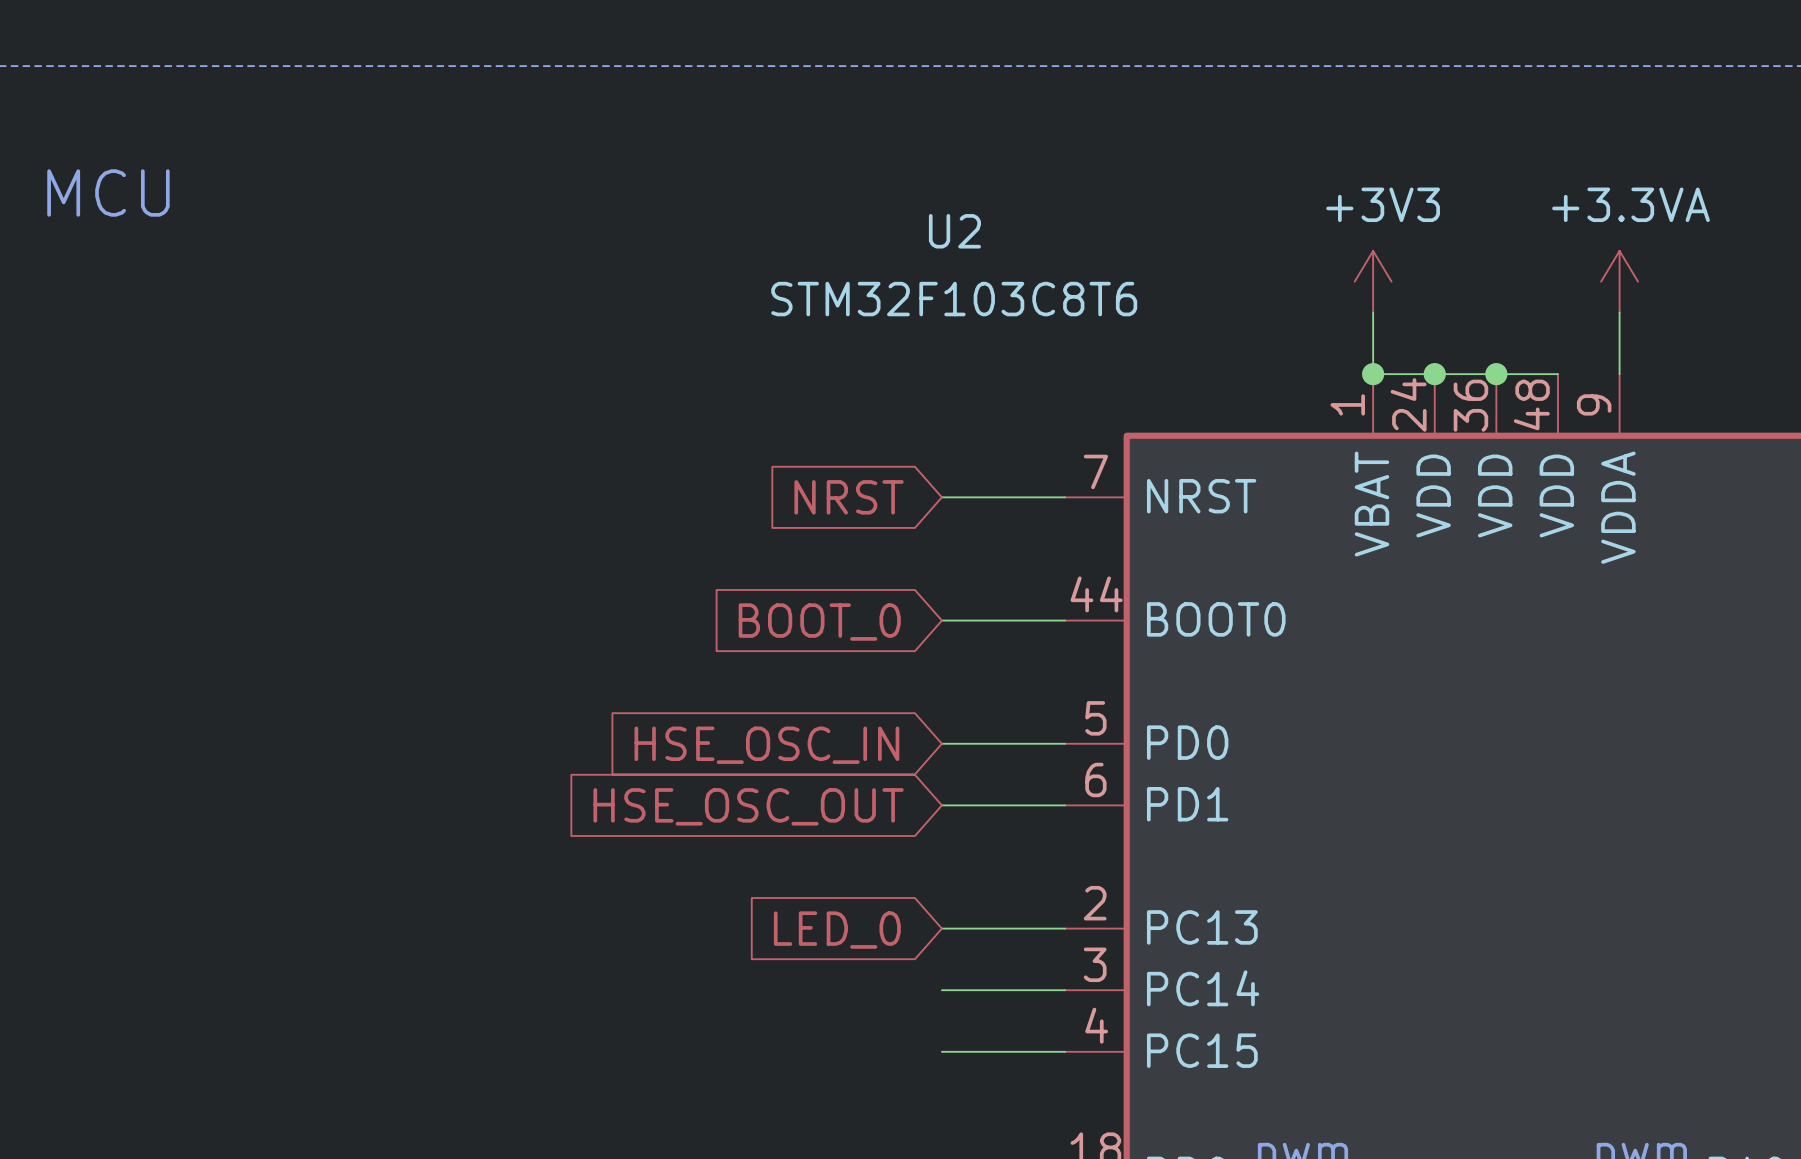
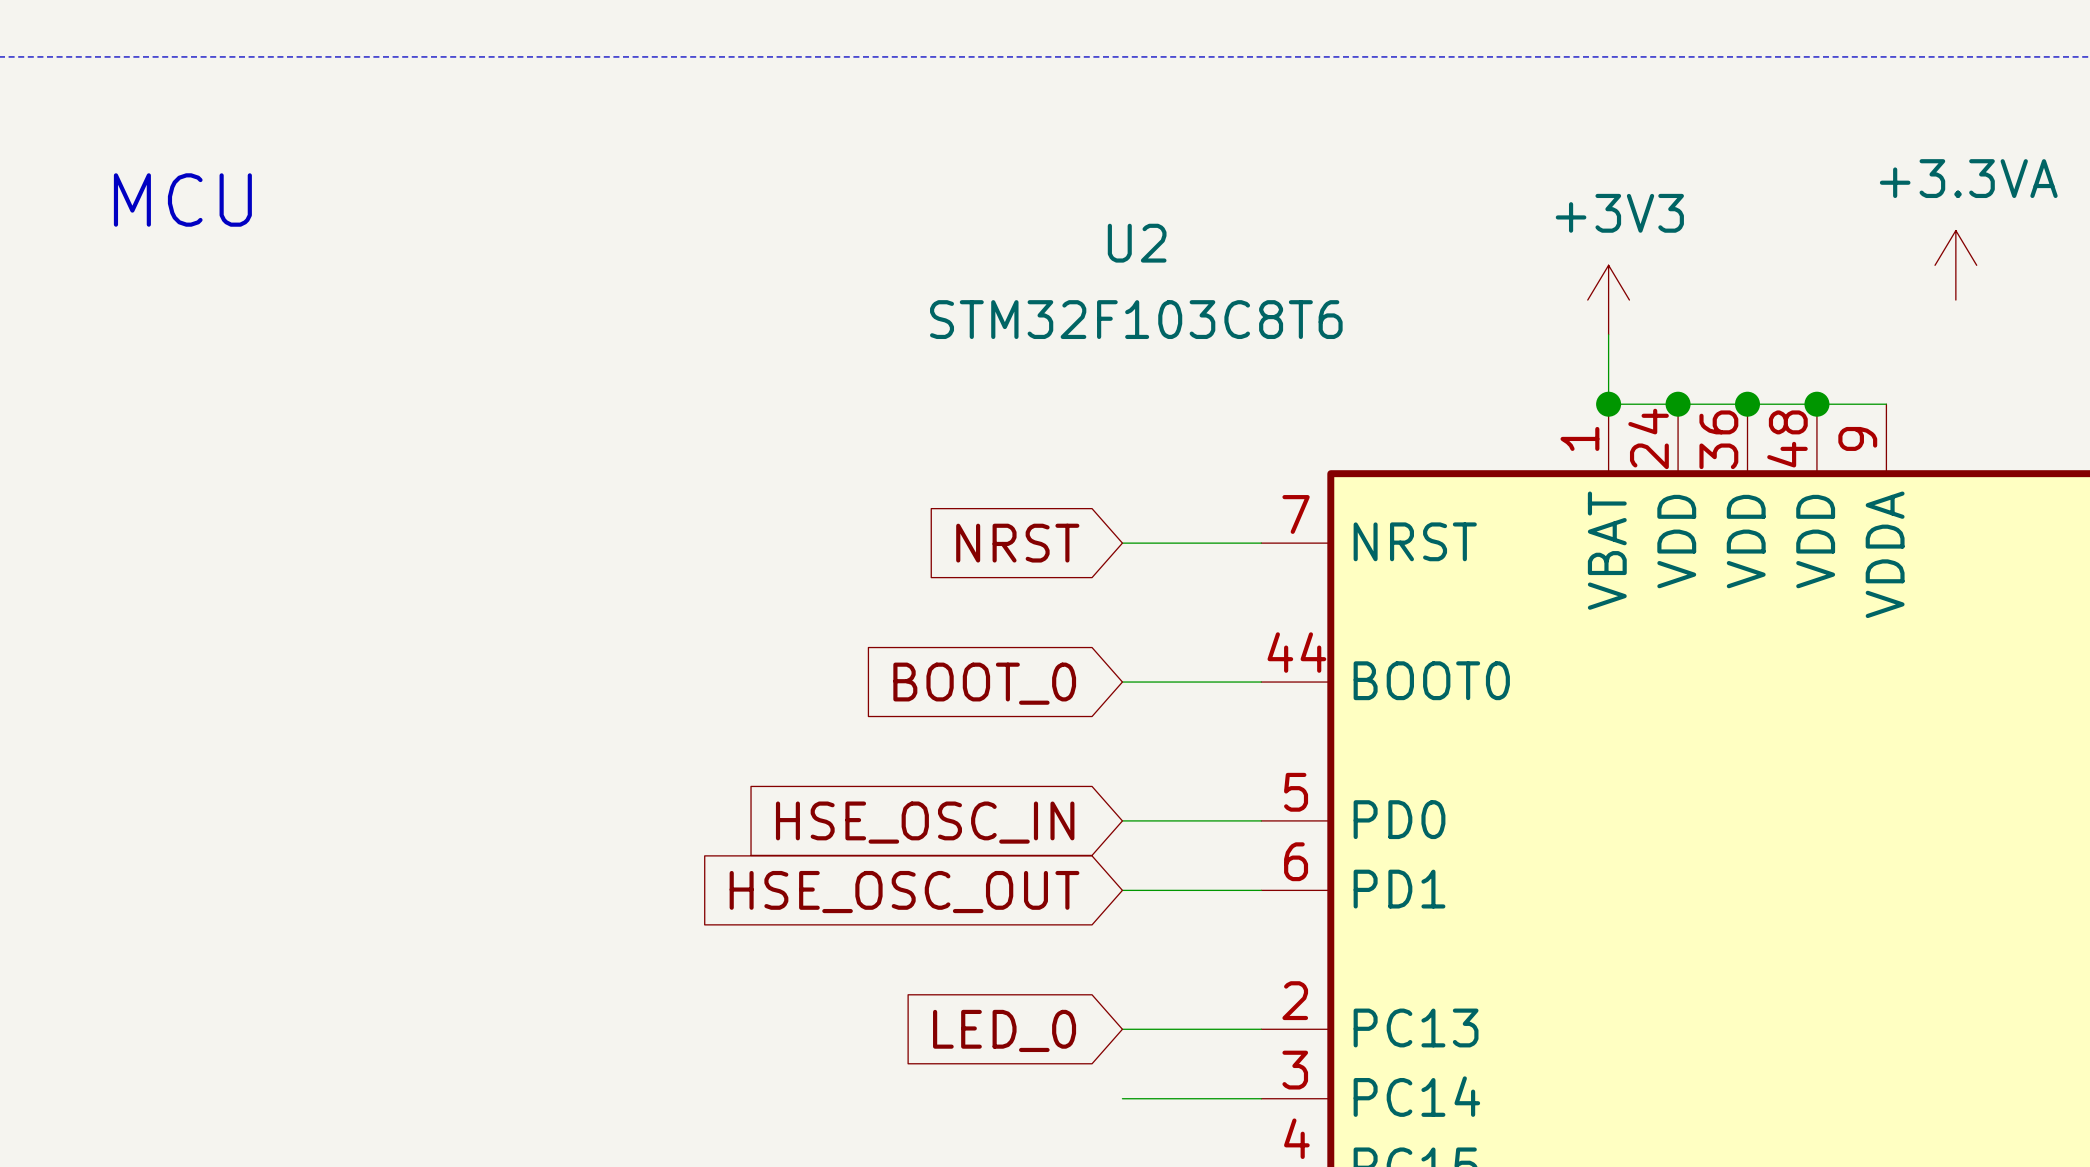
power symbol position: +3.3VA (1619, 281) -> +3.3VA (1955, 265)
wire: (1619, 312) (1619, 374) -> (1816, 404) (1886, 404)
junction: none -> (1816, 404)

